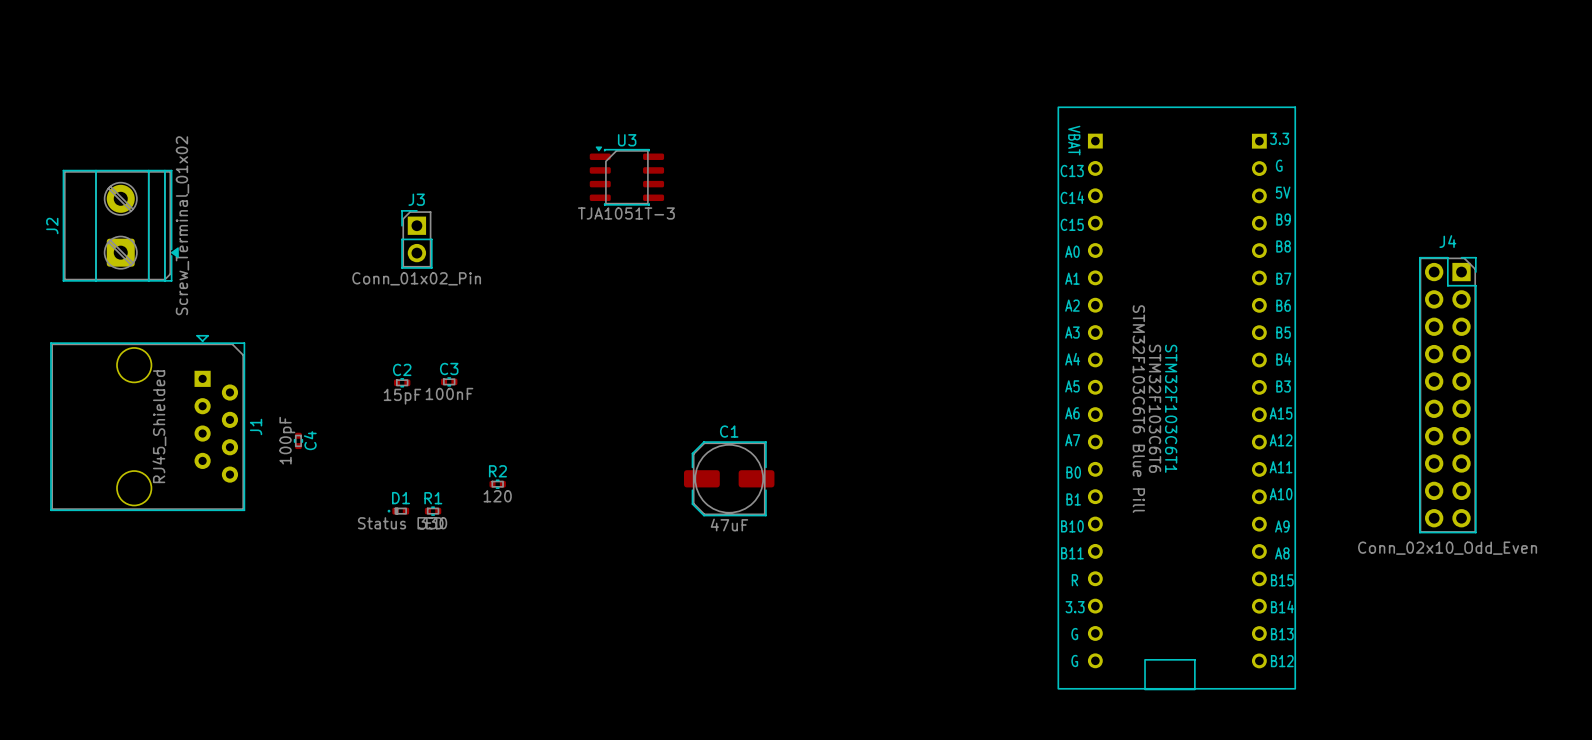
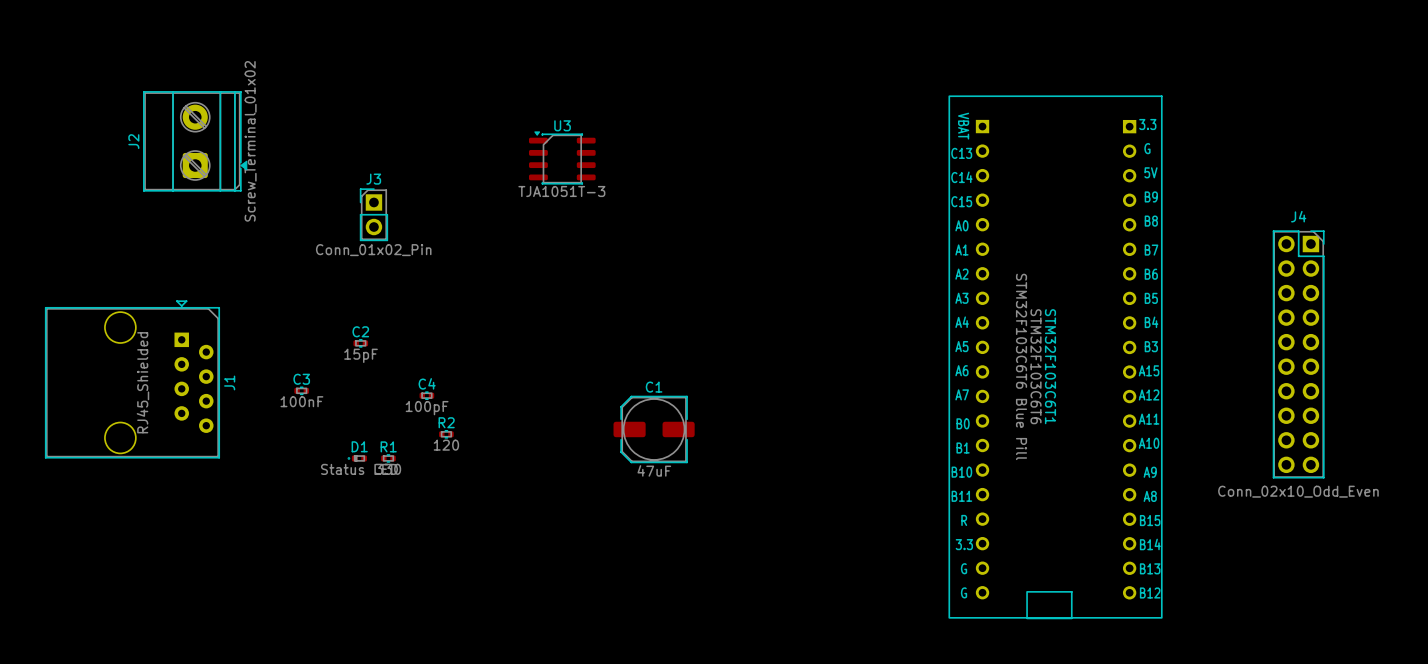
J2 position: (120, 225) -> (195, 141)
C3 position: (449, 381) -> (301, 390)
C4 rotation: 0° (298, 440) -> 90° clockwise (426, 395)
C4 position: (298, 440) -> (426, 395)

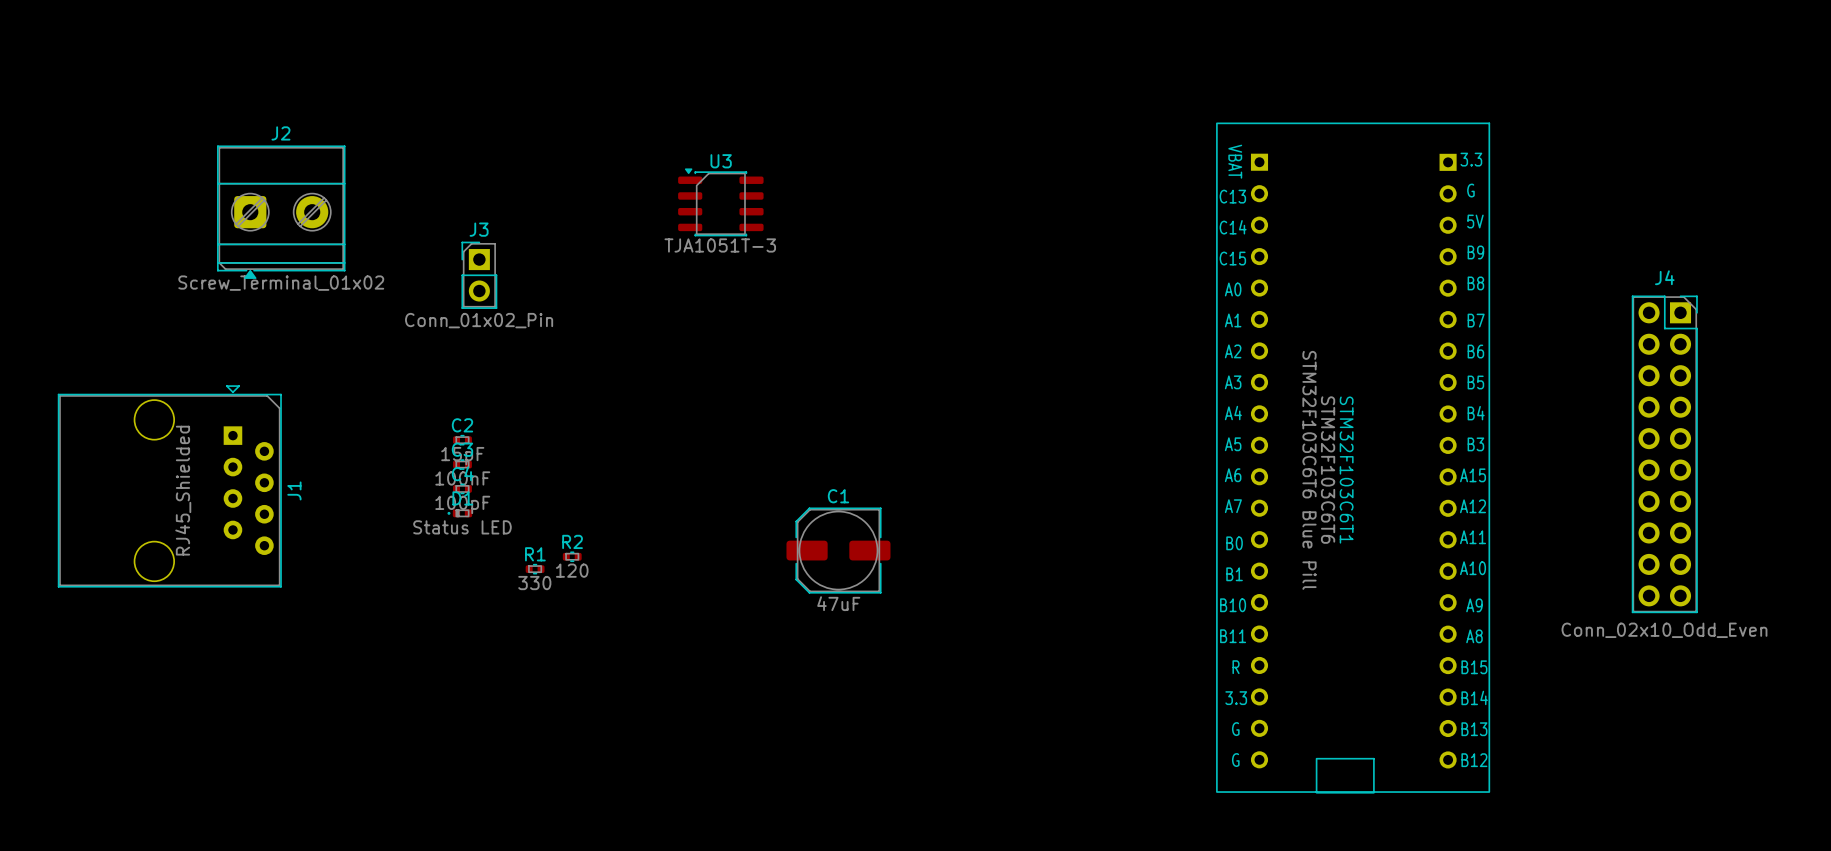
J2 rotation: 0° (195, 141) -> 90° clockwise (281, 212)
C3 position: (301, 390) -> (462, 464)
C4 position: (426, 395) -> (462, 488)
D1 position: (357, 458) -> (459, 513)
R1 position: (388, 458) -> (535, 569)

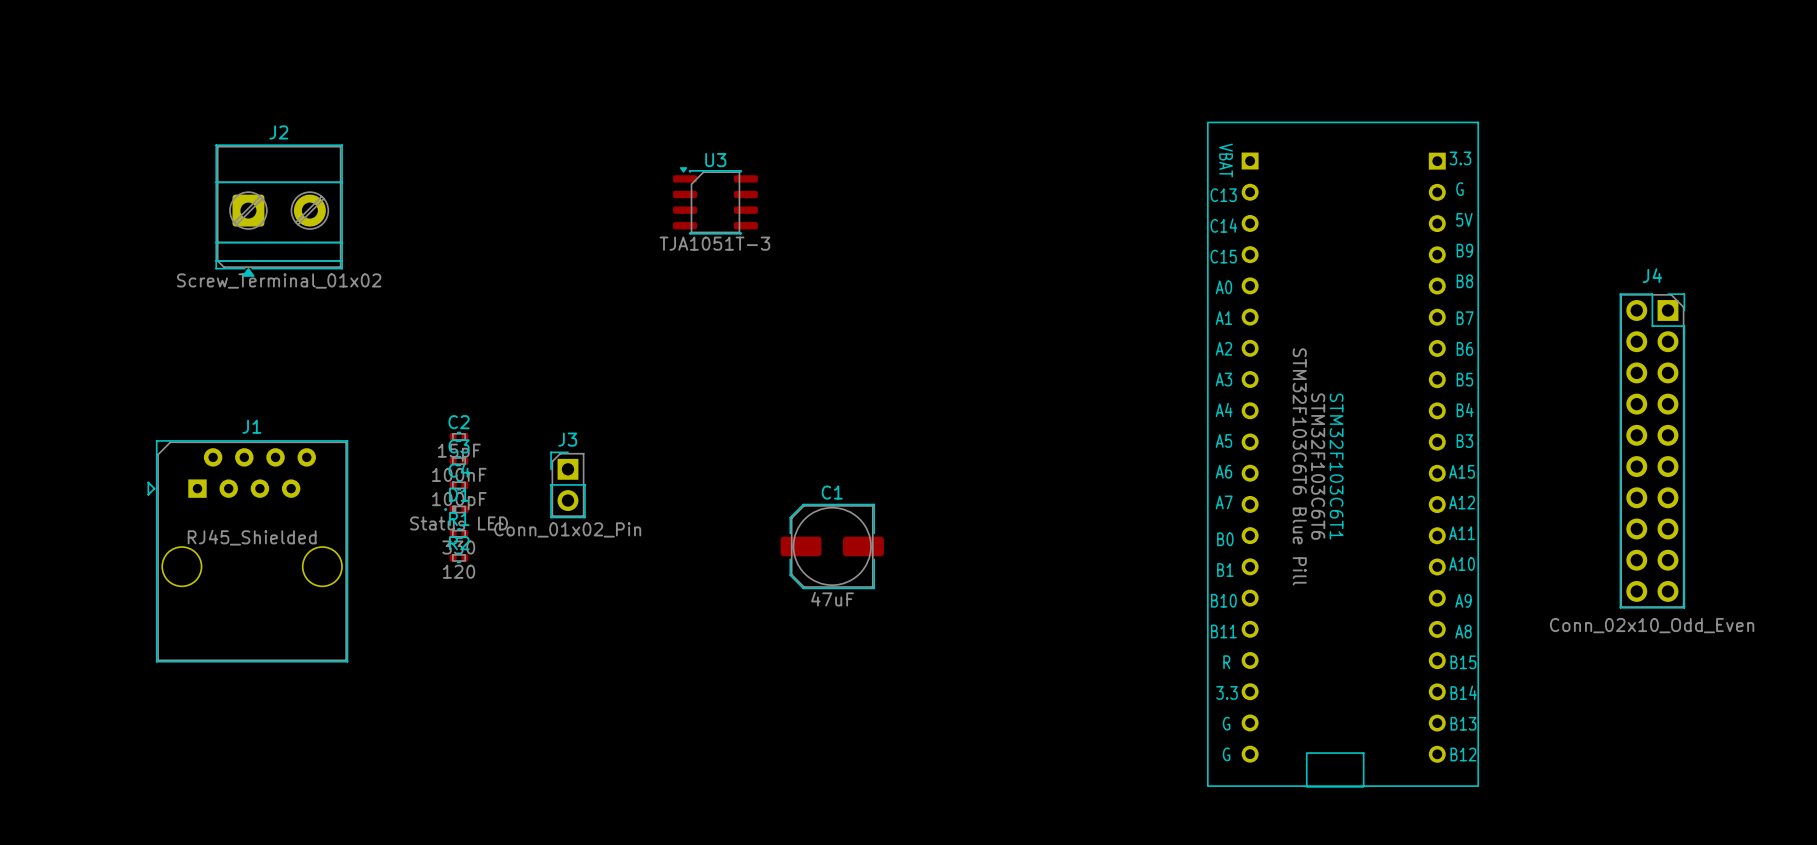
J3 position: (479, 275) -> (567, 484)
J1 rotation: 0° (169, 486) -> 90° counterclockwise (247, 551)
R2 position: (572, 556) -> (459, 557)
R1 position: (535, 569) -> (459, 533)

